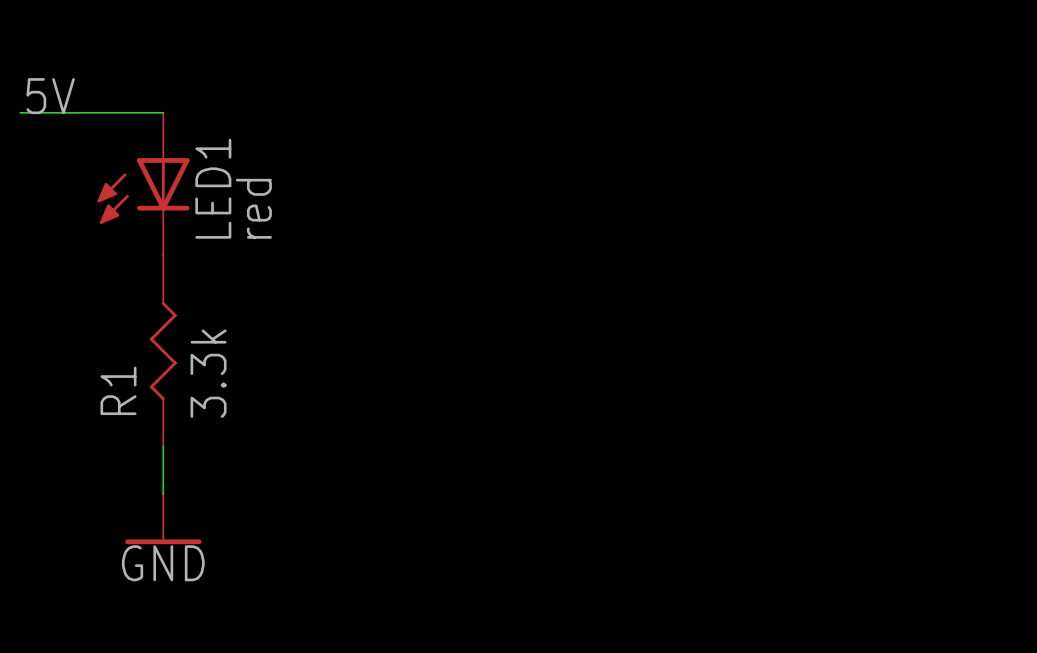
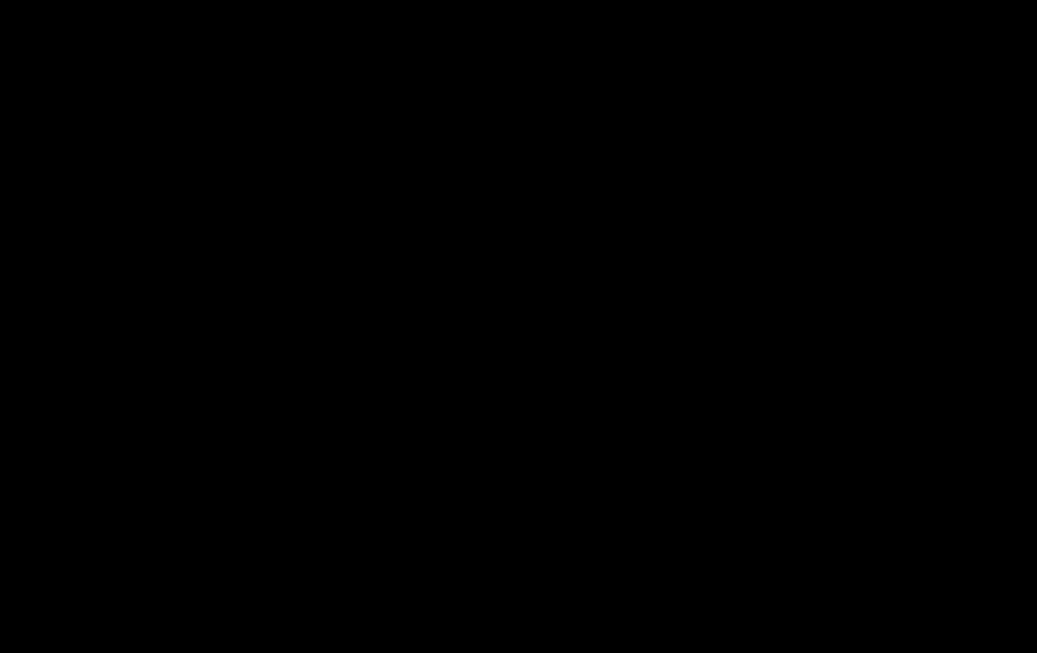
label: 5V (50, 96) -> none
wire: (20, 112) (163, 112) -> none
LED1: red (143, 184) -> none
R1: 3.3k (163, 351) -> none
wire: (163, 446) (163, 494) -> none
power symbol: GND (163, 519) -> none

